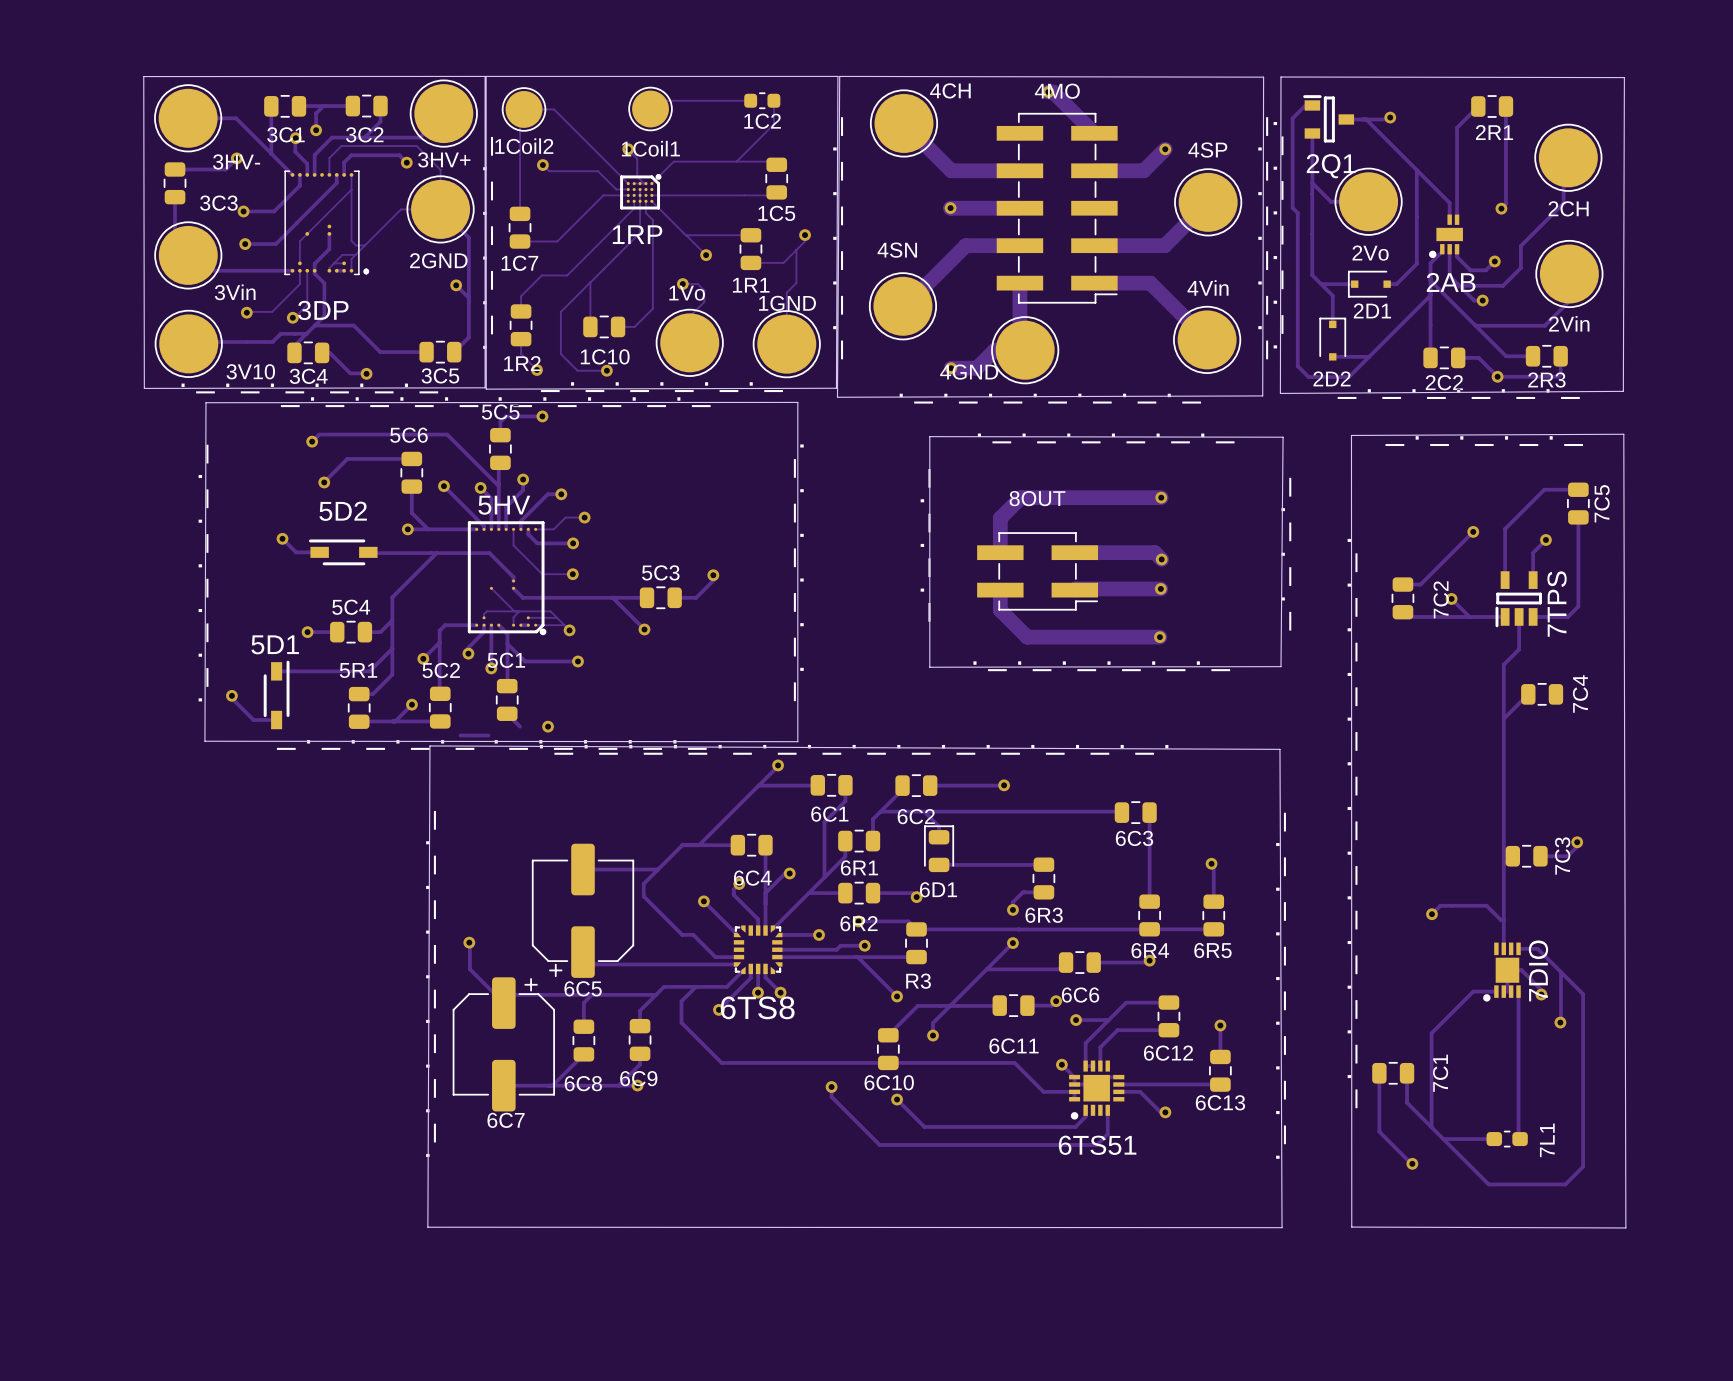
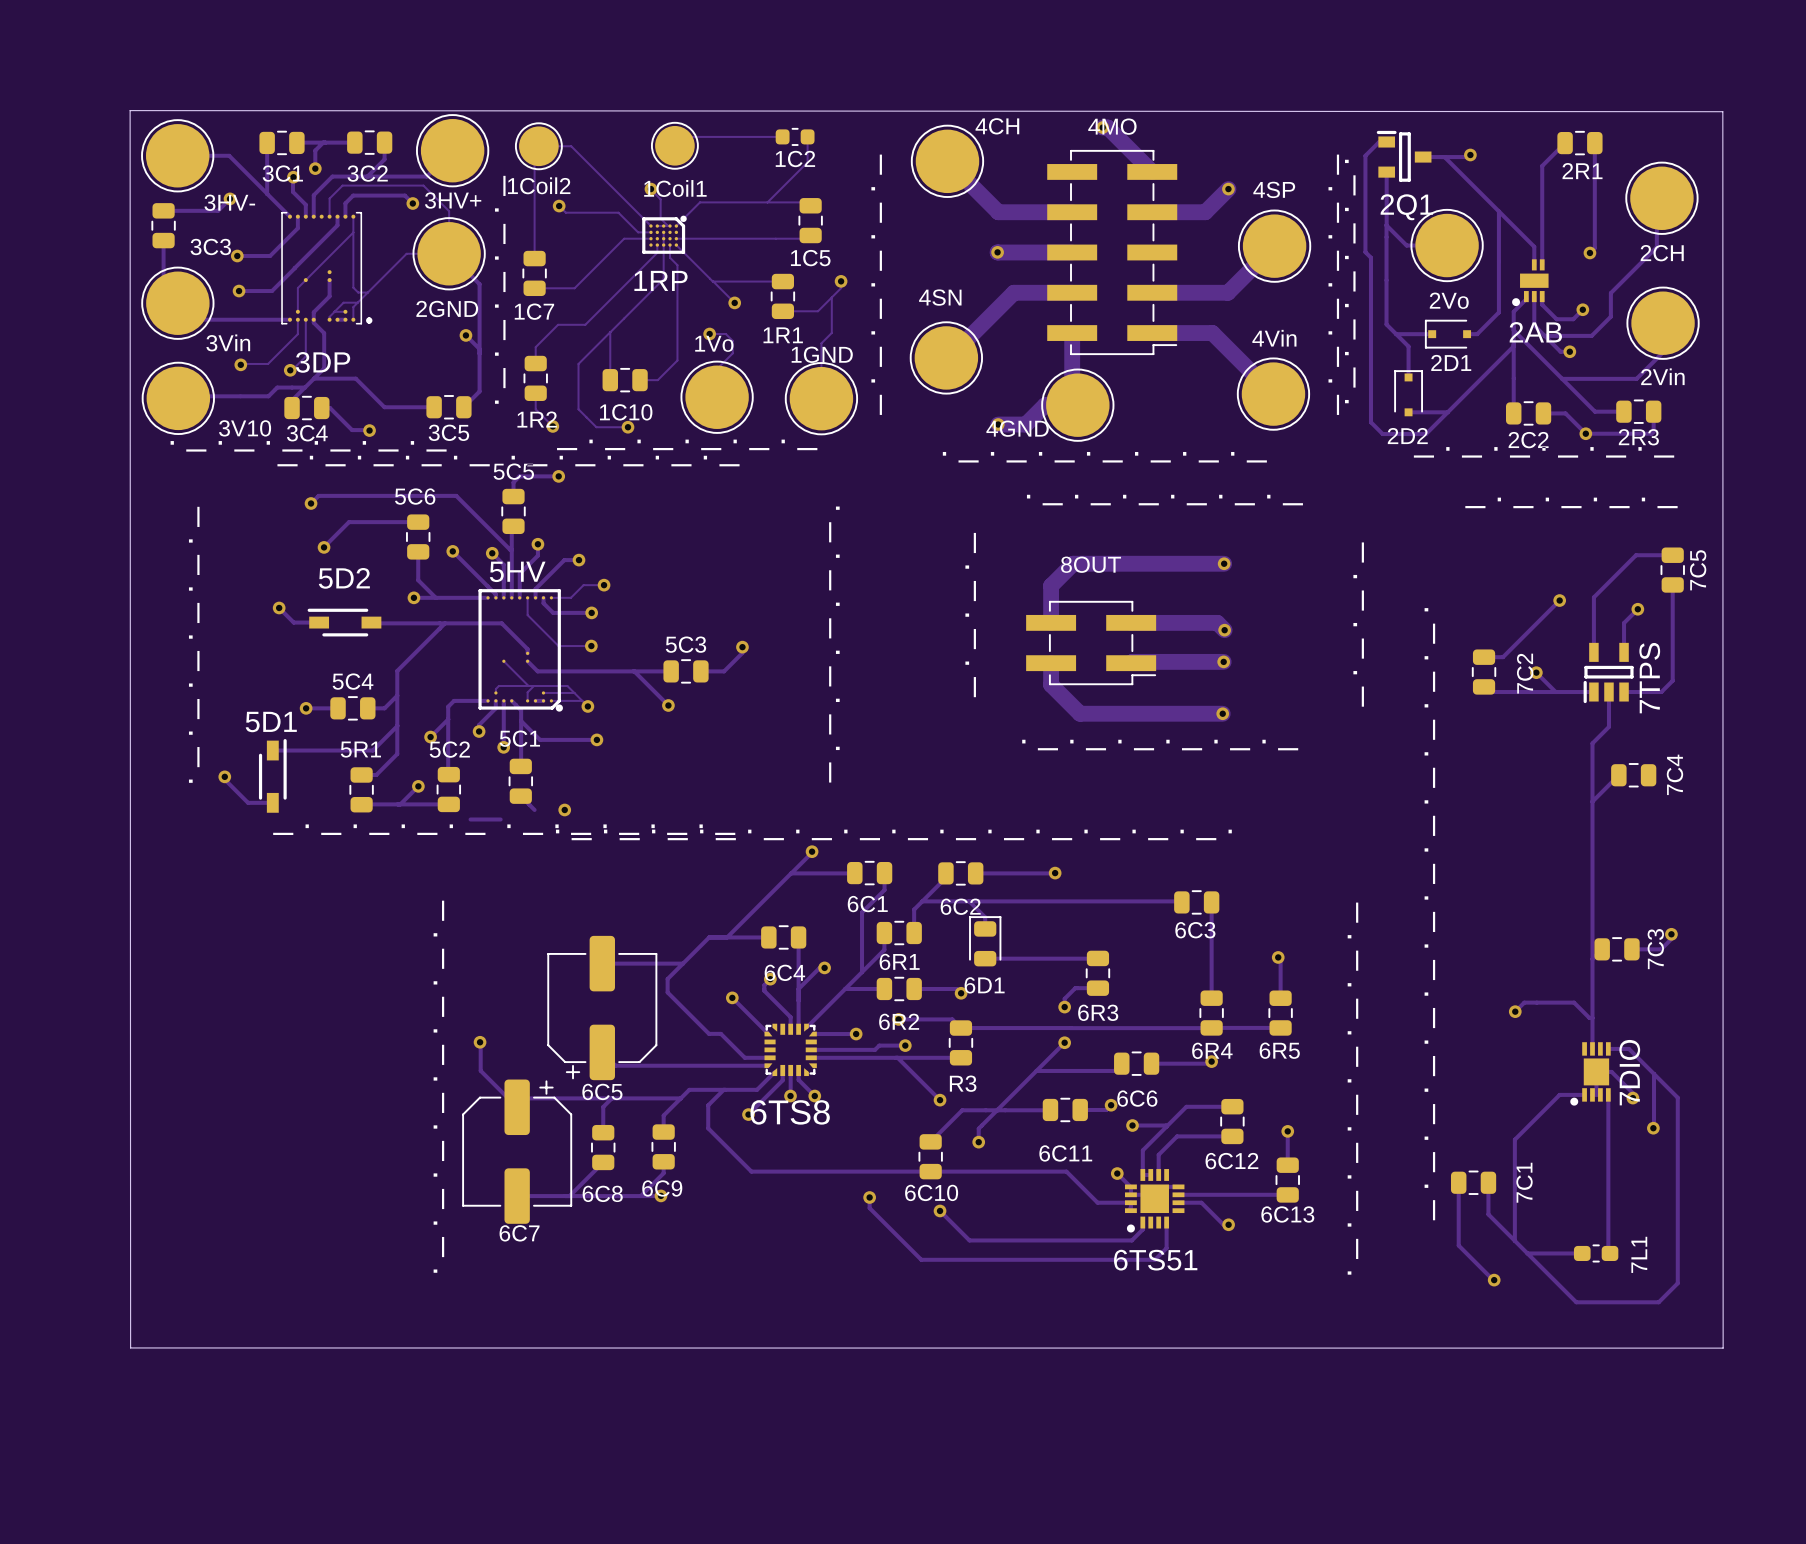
board edge: none -> (130, 110) (130, 1347) (1723, 1348) (1722, 111) (130, 110)
board edge: (485, 76) (485, 387) (144, 388) (143, 76) (485, 76) -> none
board edge: (486, 76) (486, 389) (836, 388) (837, 76) (486, 76) -> none
board edge: (839, 76) (837, 397) (1262, 395) (1263, 77) (839, 76) -> none
board edge: (1280, 77) (1624, 77) (1623, 391) (1280, 393) (1280, 77) -> none
board edge: (797, 402) (797, 741) (204, 741) (205, 402) (797, 402) -> none
board edge: (1623, 434) (1625, 1227) (1351, 1227) (1351, 435) (1623, 434) -> none
board edge: (929, 436) (1283, 437) (1280, 666) (929, 667) (929, 436) -> none
board edge: (429, 745) (427, 1227) (1282, 1227) (1279, 749) (429, 745) -> none

